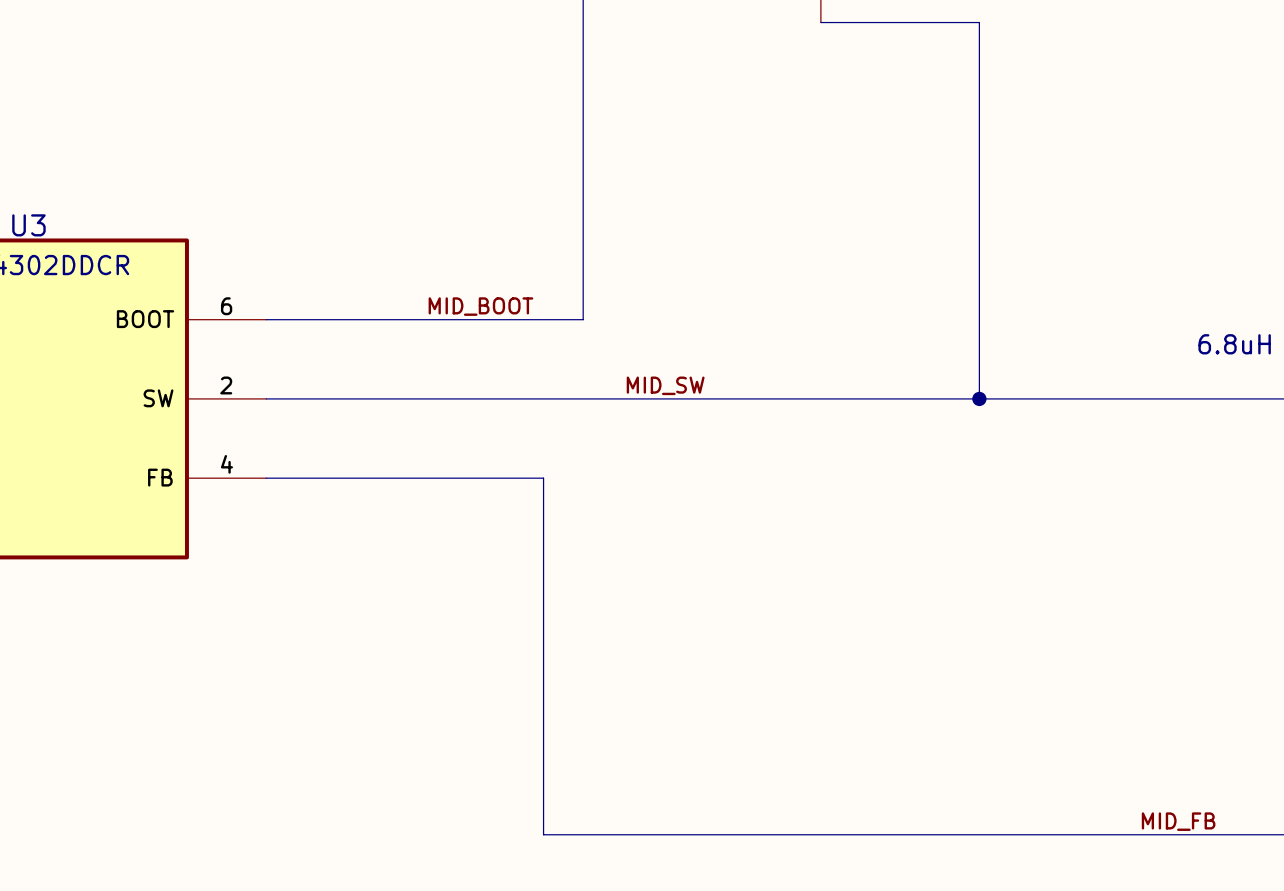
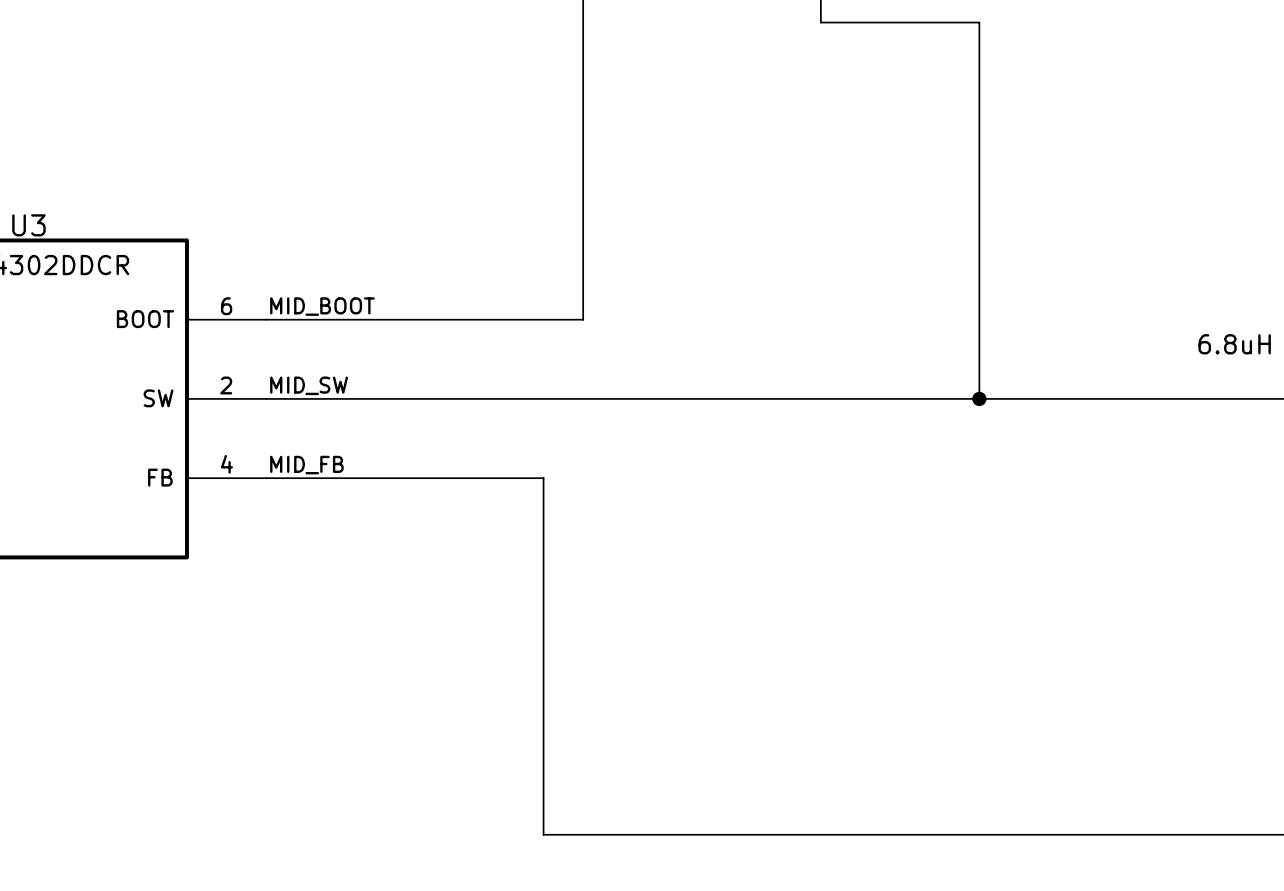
label position: MID_BOOT (480, 306) -> MID_BOOT (322, 306)
label position: MID_SW (665, 385) -> MID_SW (309, 385)
label: none -> MID_FB (306, 465)
label: MID_FB (1178, 821) -> none

